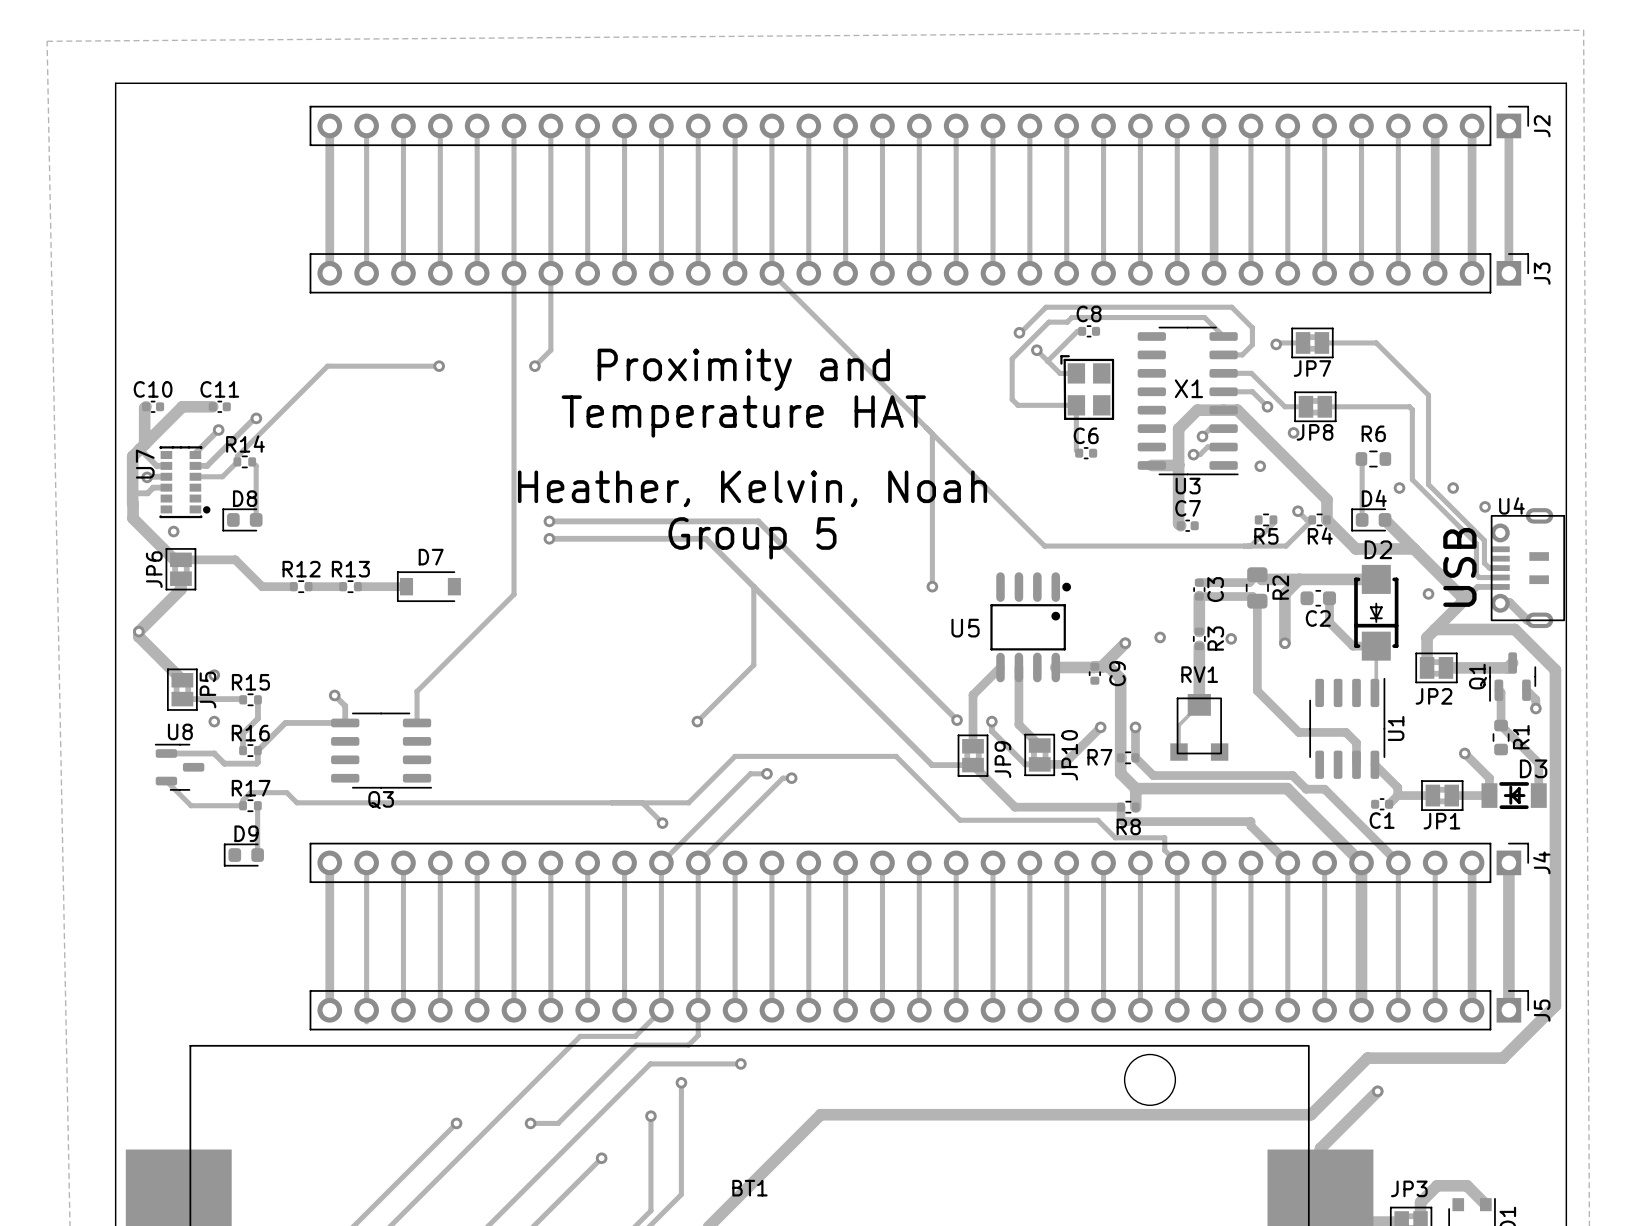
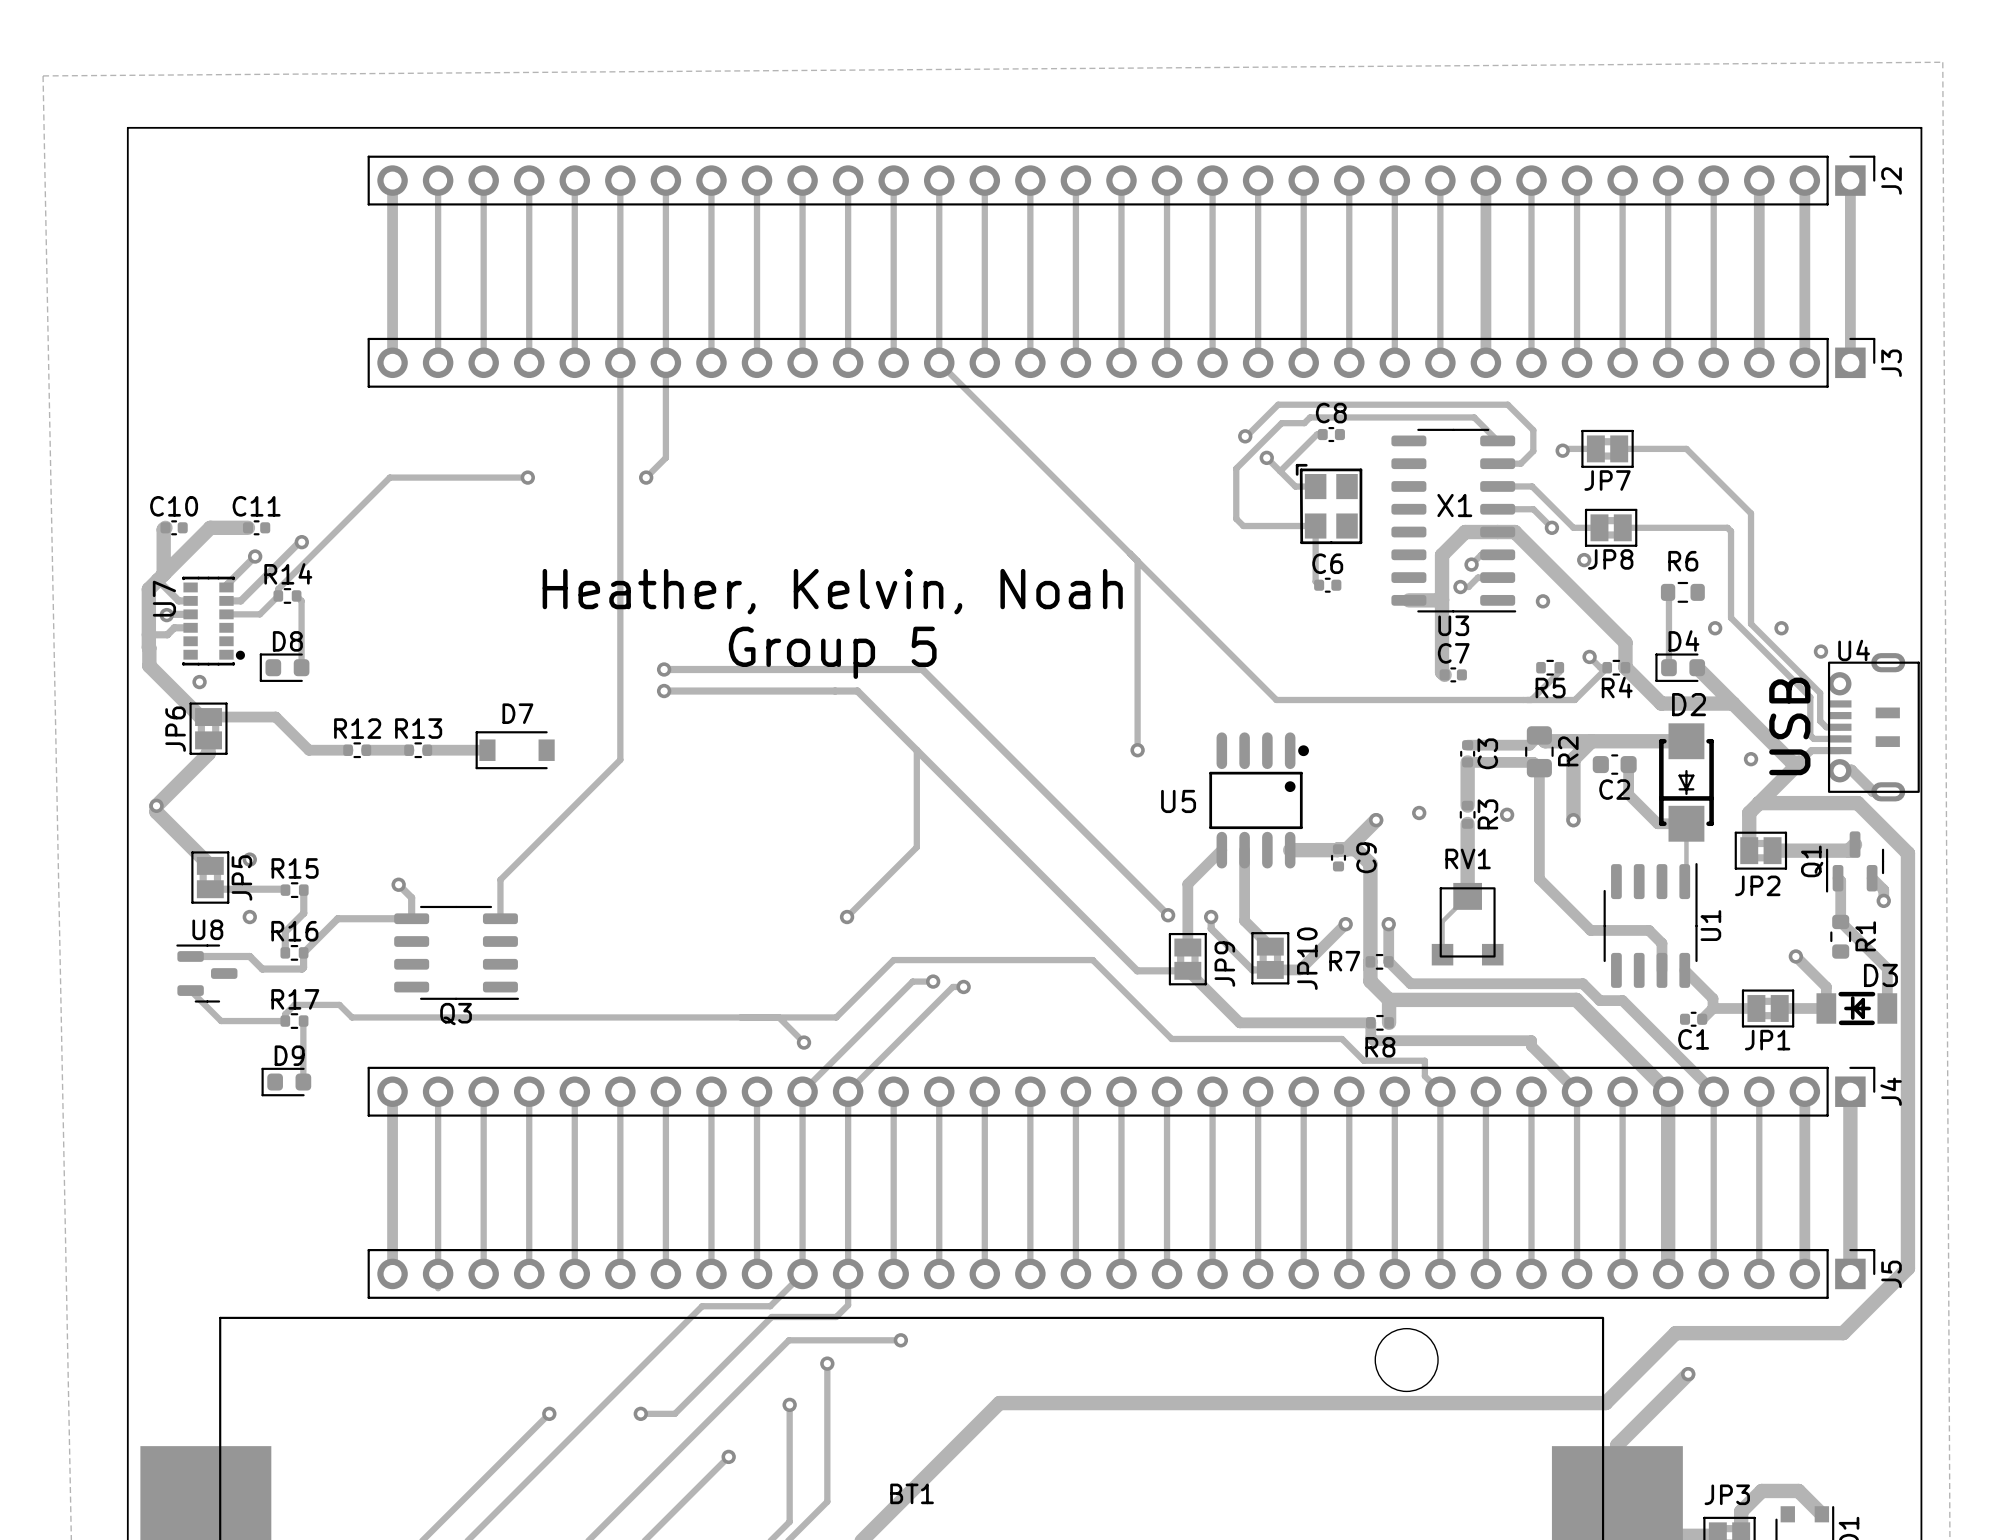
text: Proximity and (743, 369) -> none
text: Temperature HAT (743, 416) -> none
text position: Heather, Kelvin, Noah (752, 488) -> Heather, Kelvin, Noah (832, 591)
text position: Group 5 (752, 538) -> Group 5 (832, 652)

